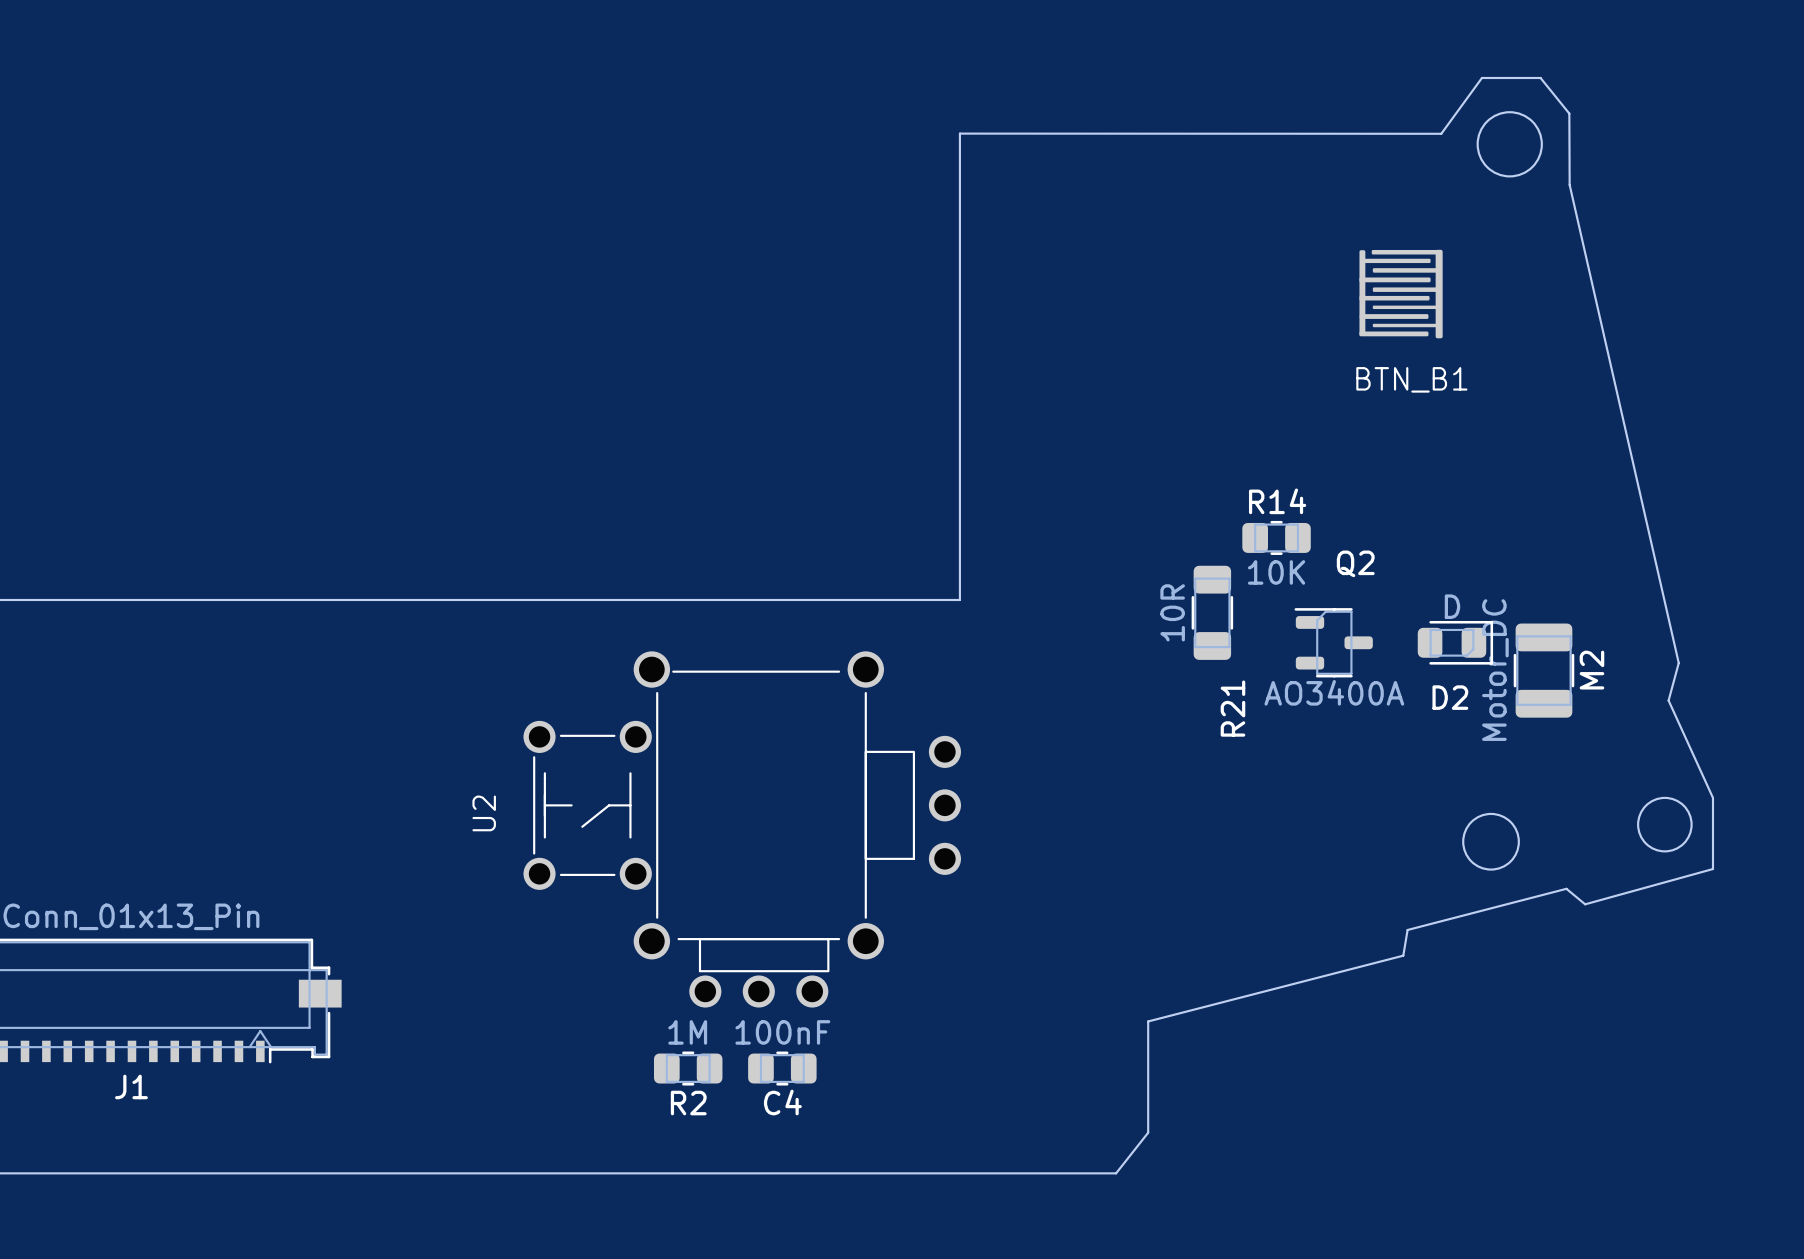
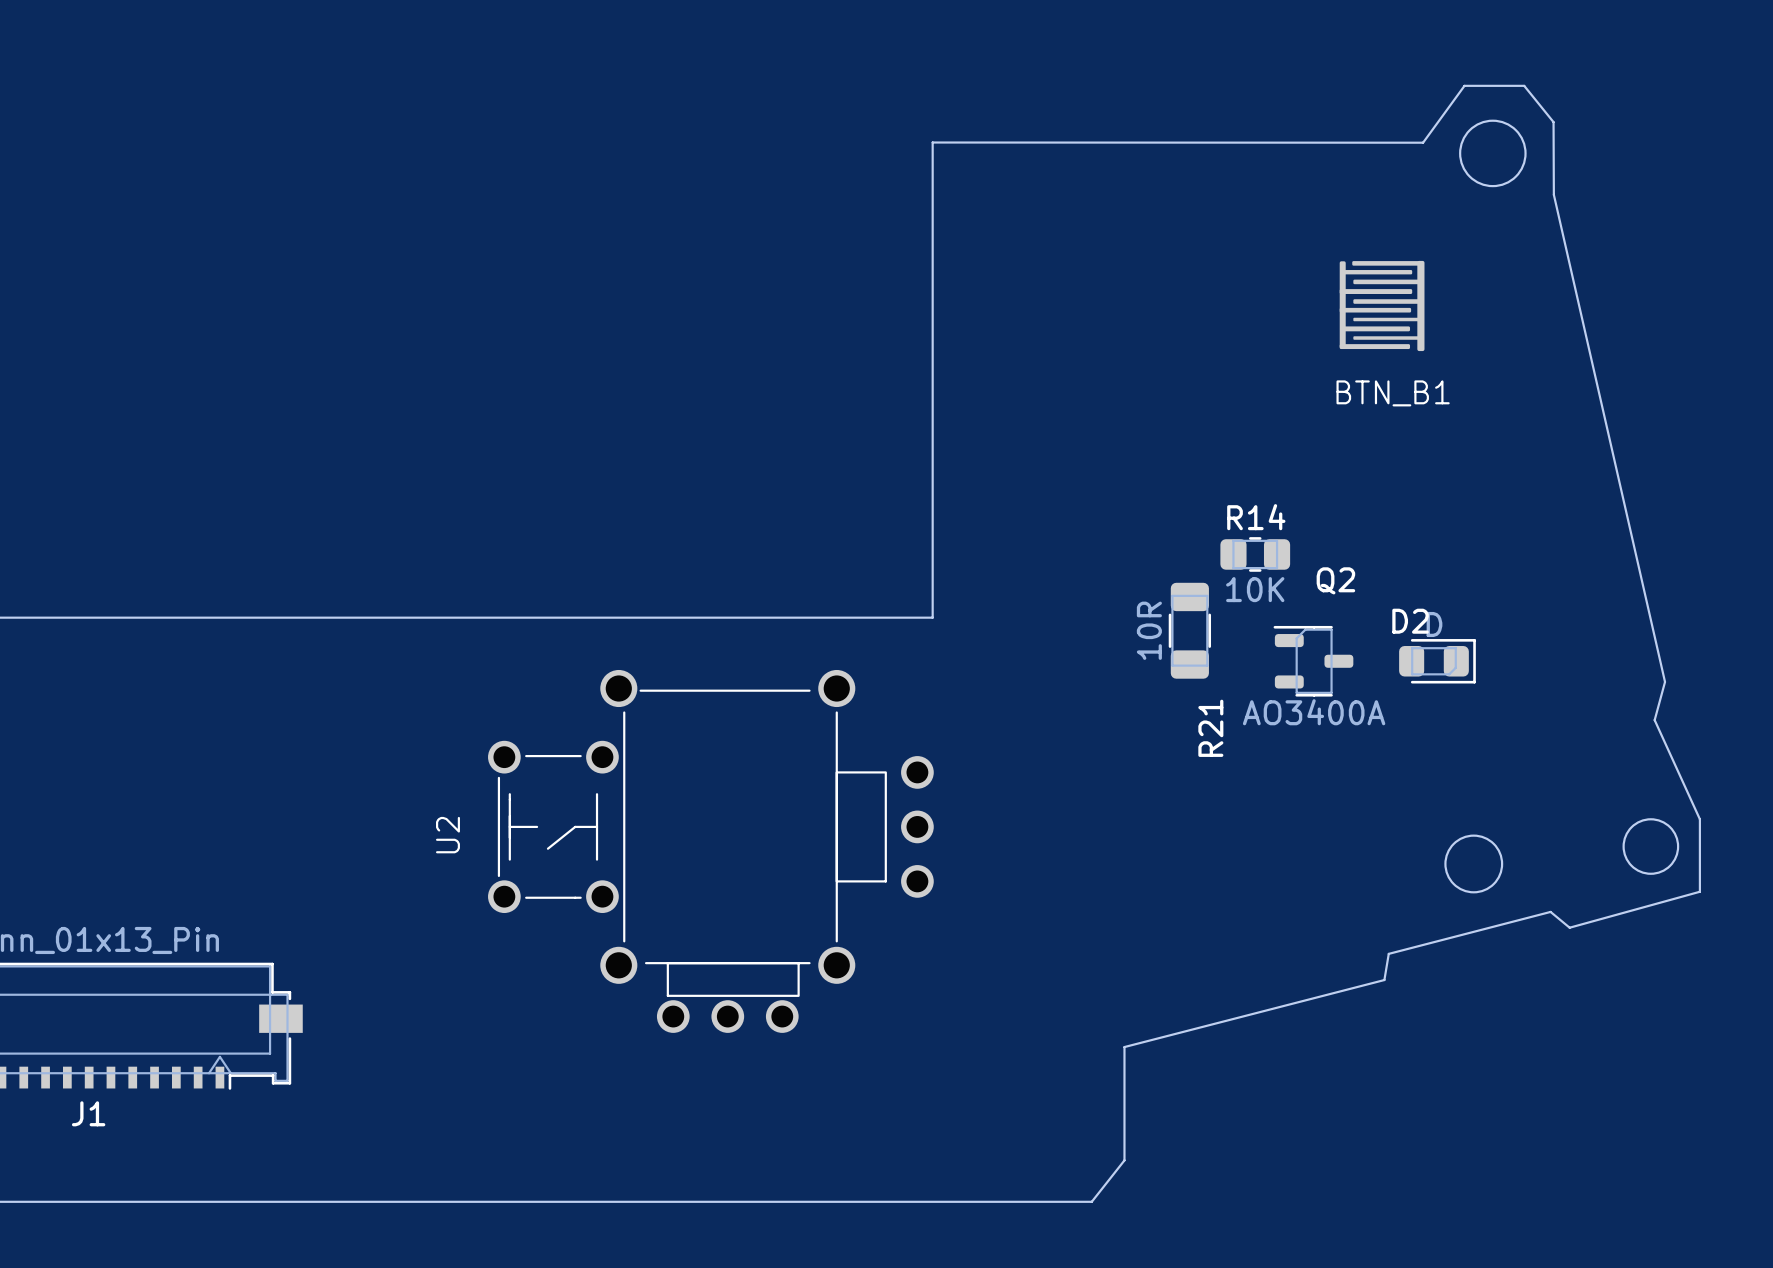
M2: Motor_DC (1543, 670) -> none
D2 name position: D2 (1450, 697) -> D2 (1410, 621)
R2: 1M (688, 1068) -> none
C4: 100nF (782, 1068) -> none

